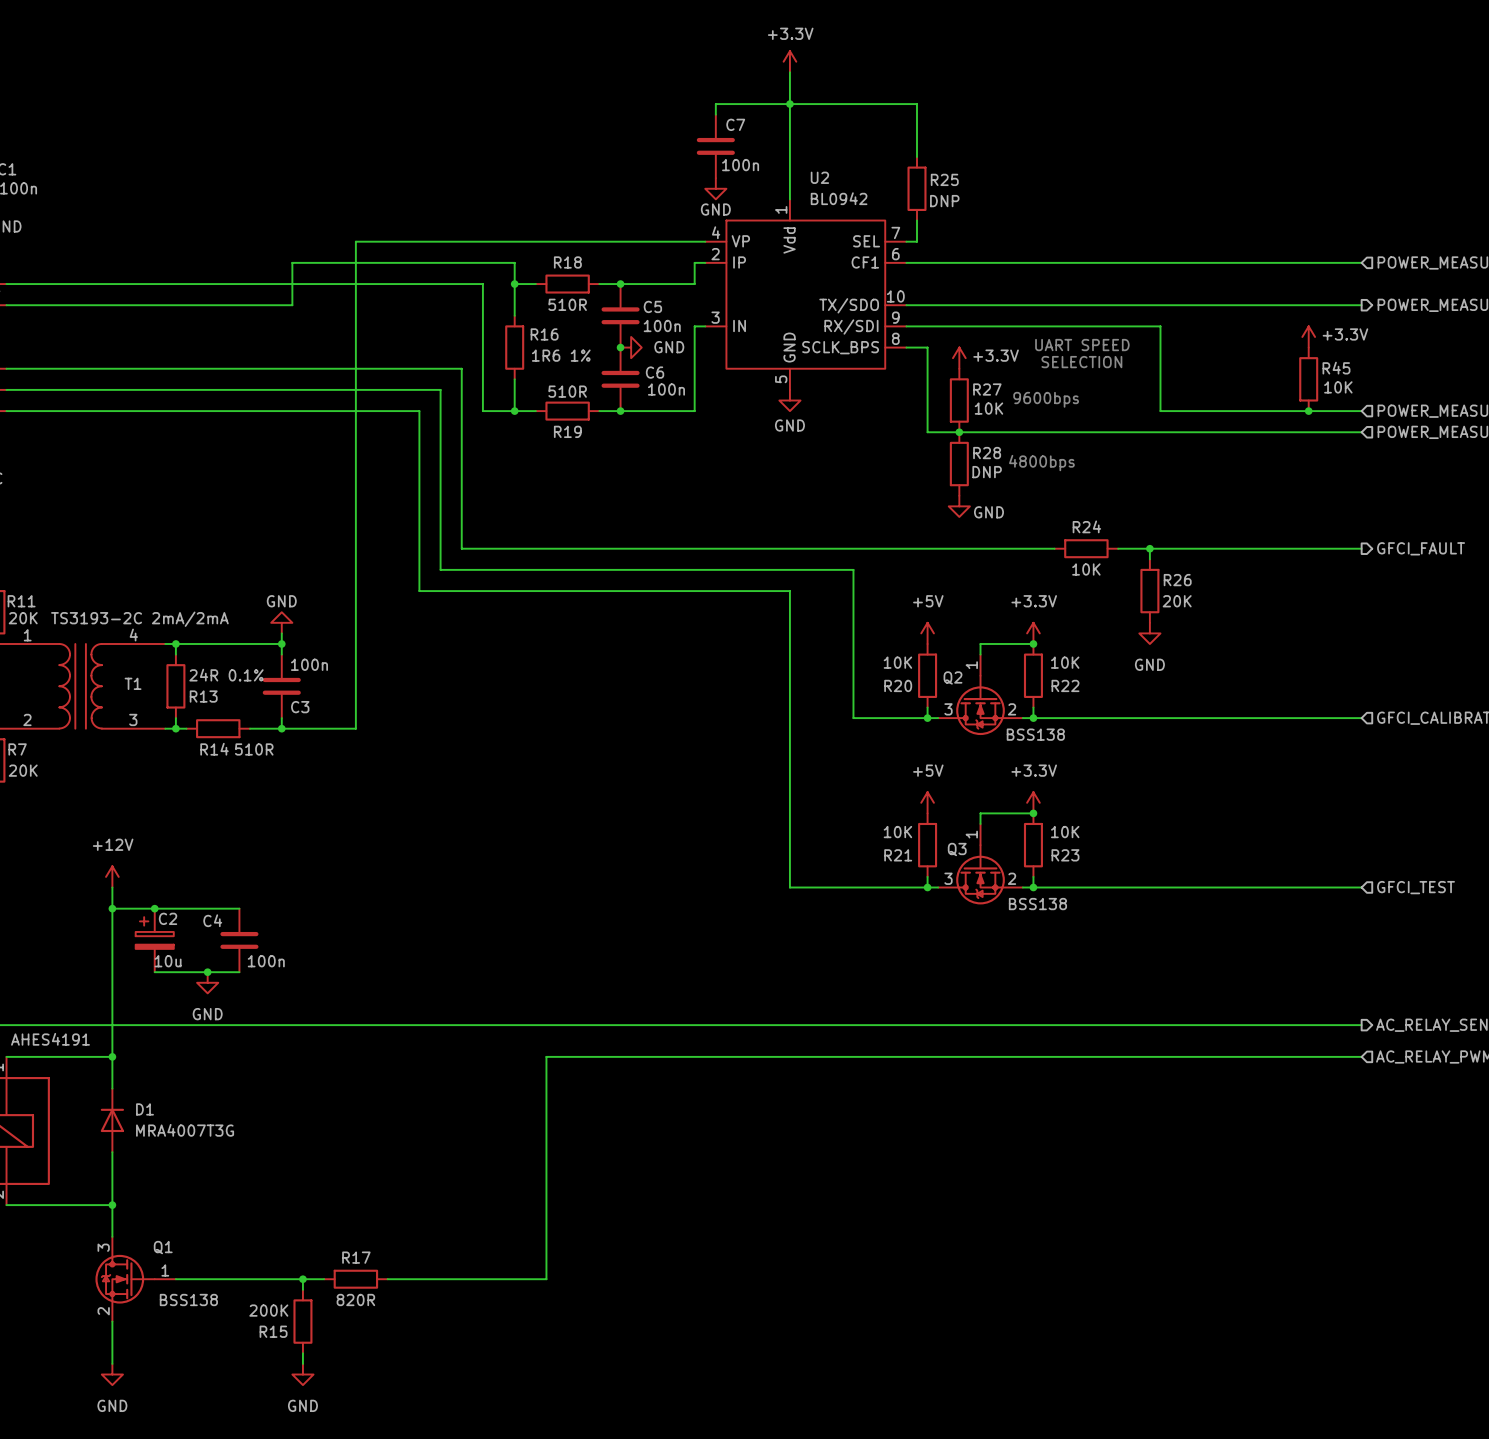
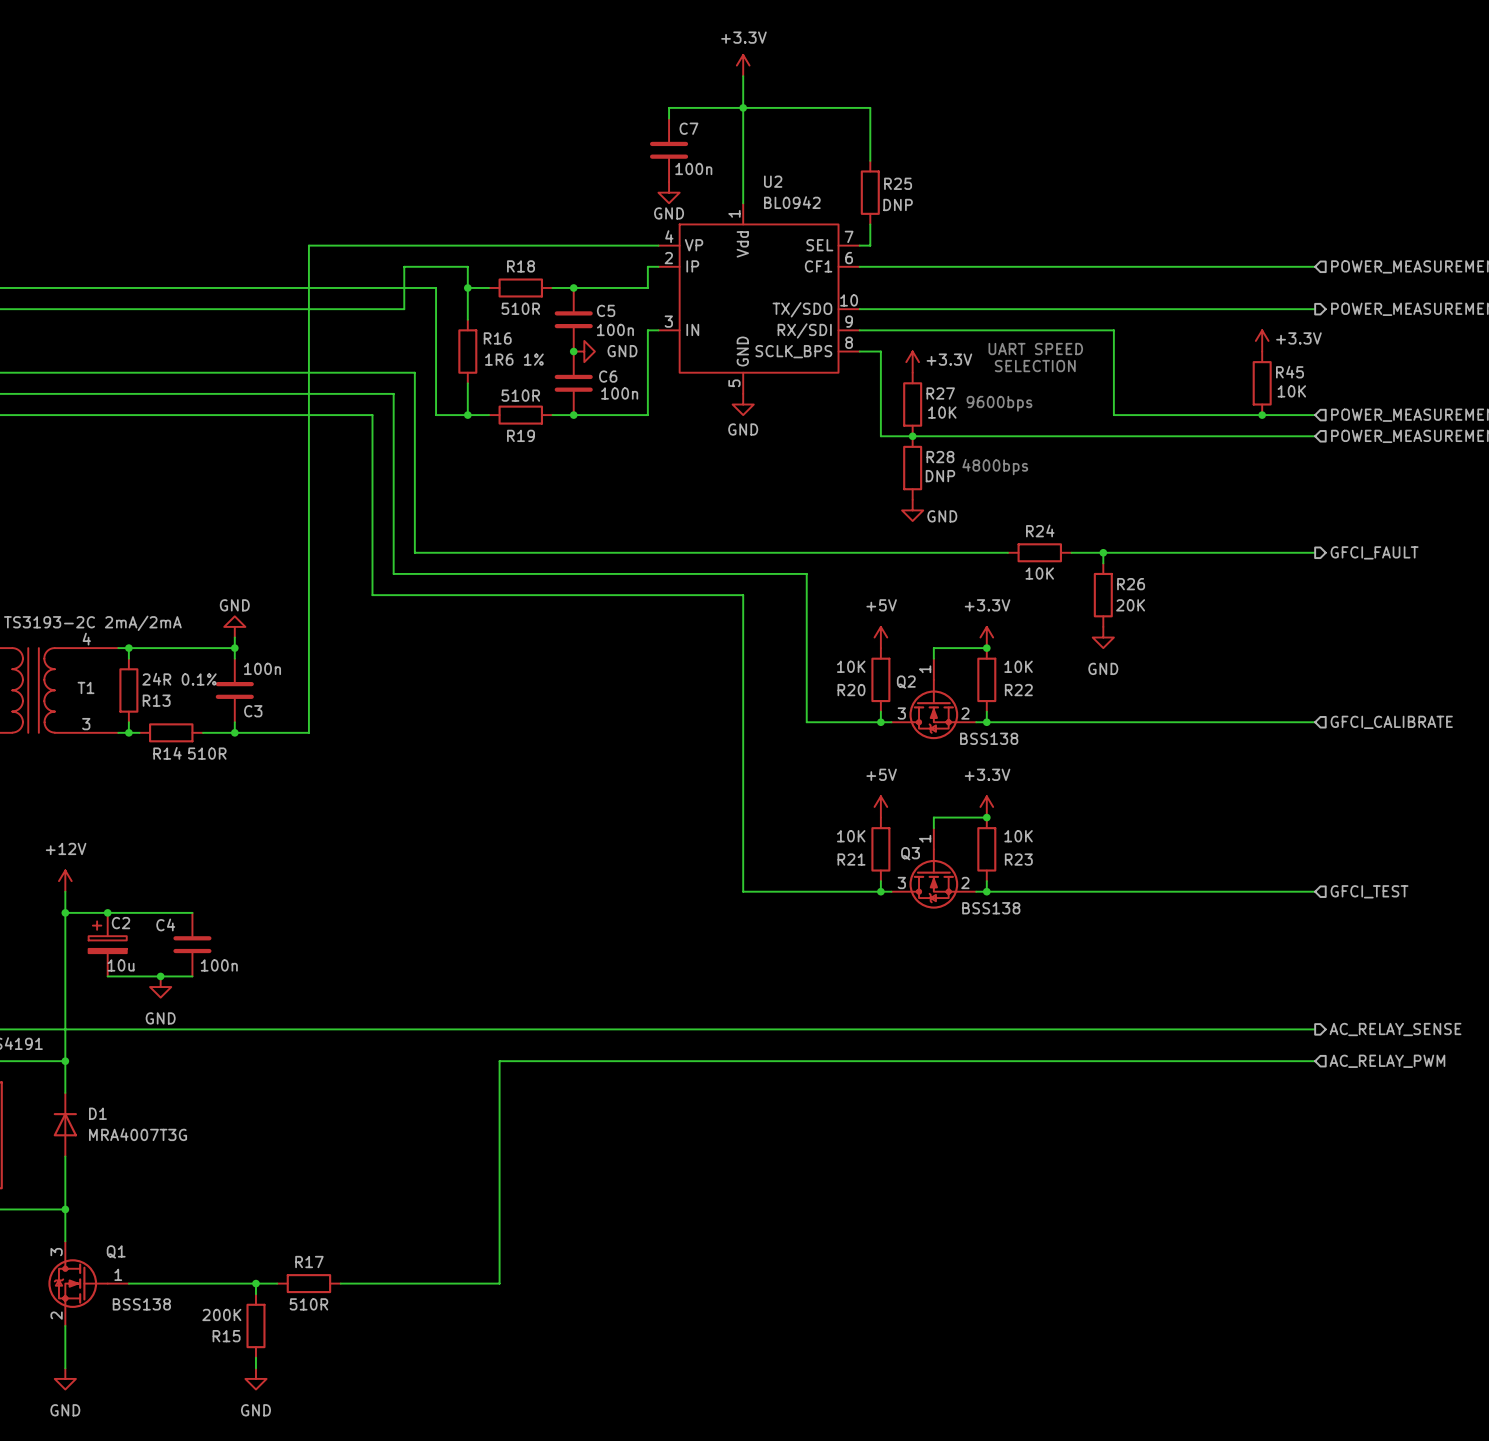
wire: (451, 262) (292, 262) (292, 305) -> (404, 266) (404, 309) (245, 309)
R17 value: 820R (355, 1299) -> 510R (308, 1304)

